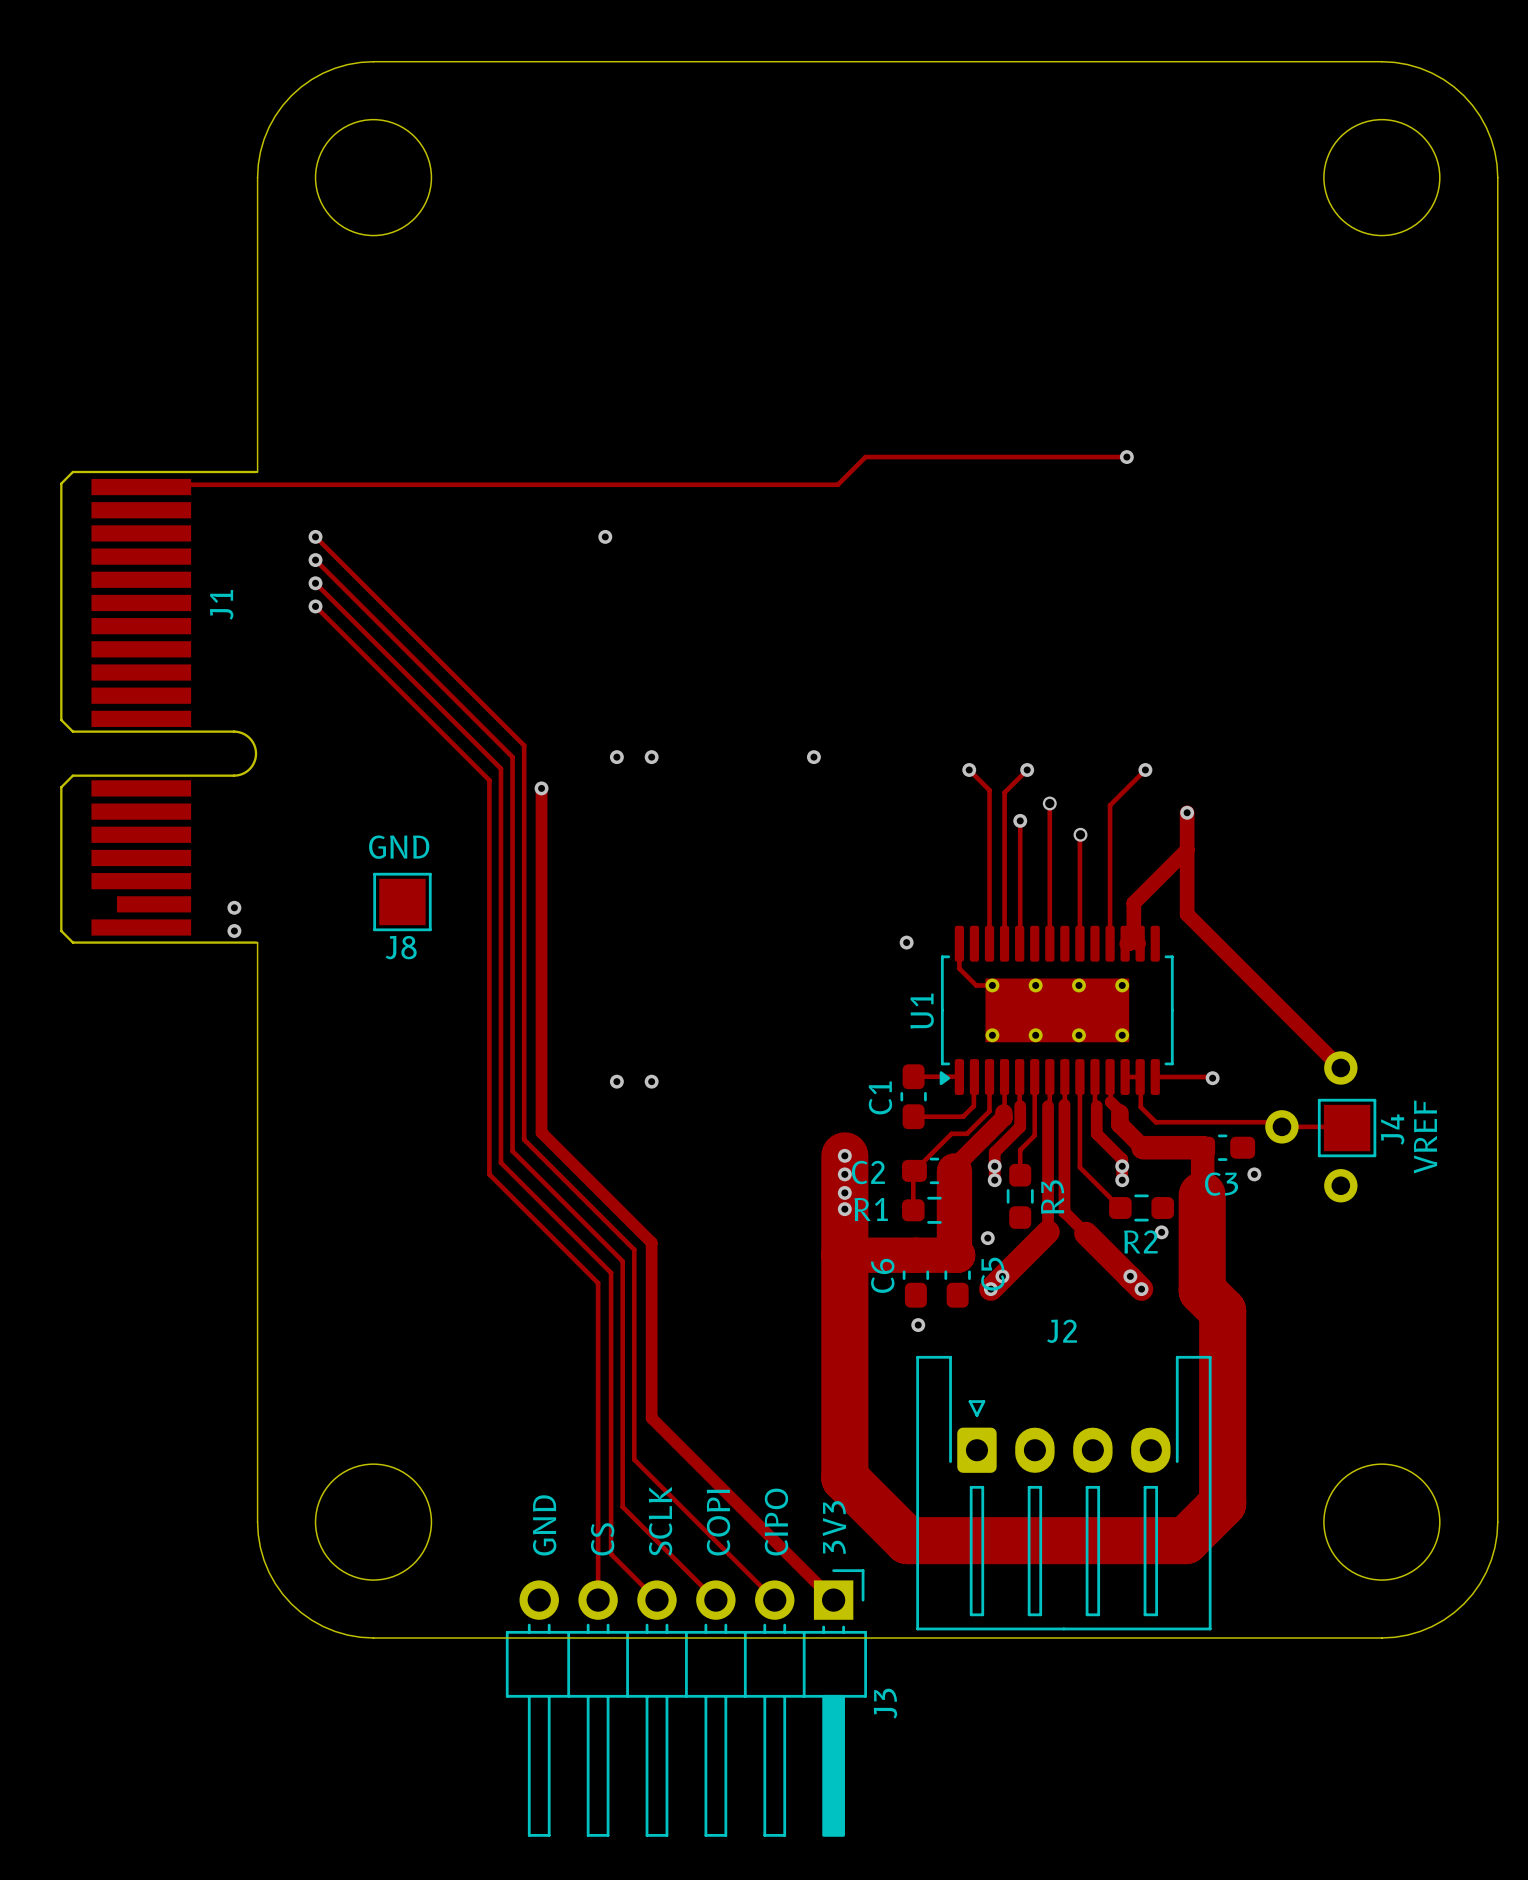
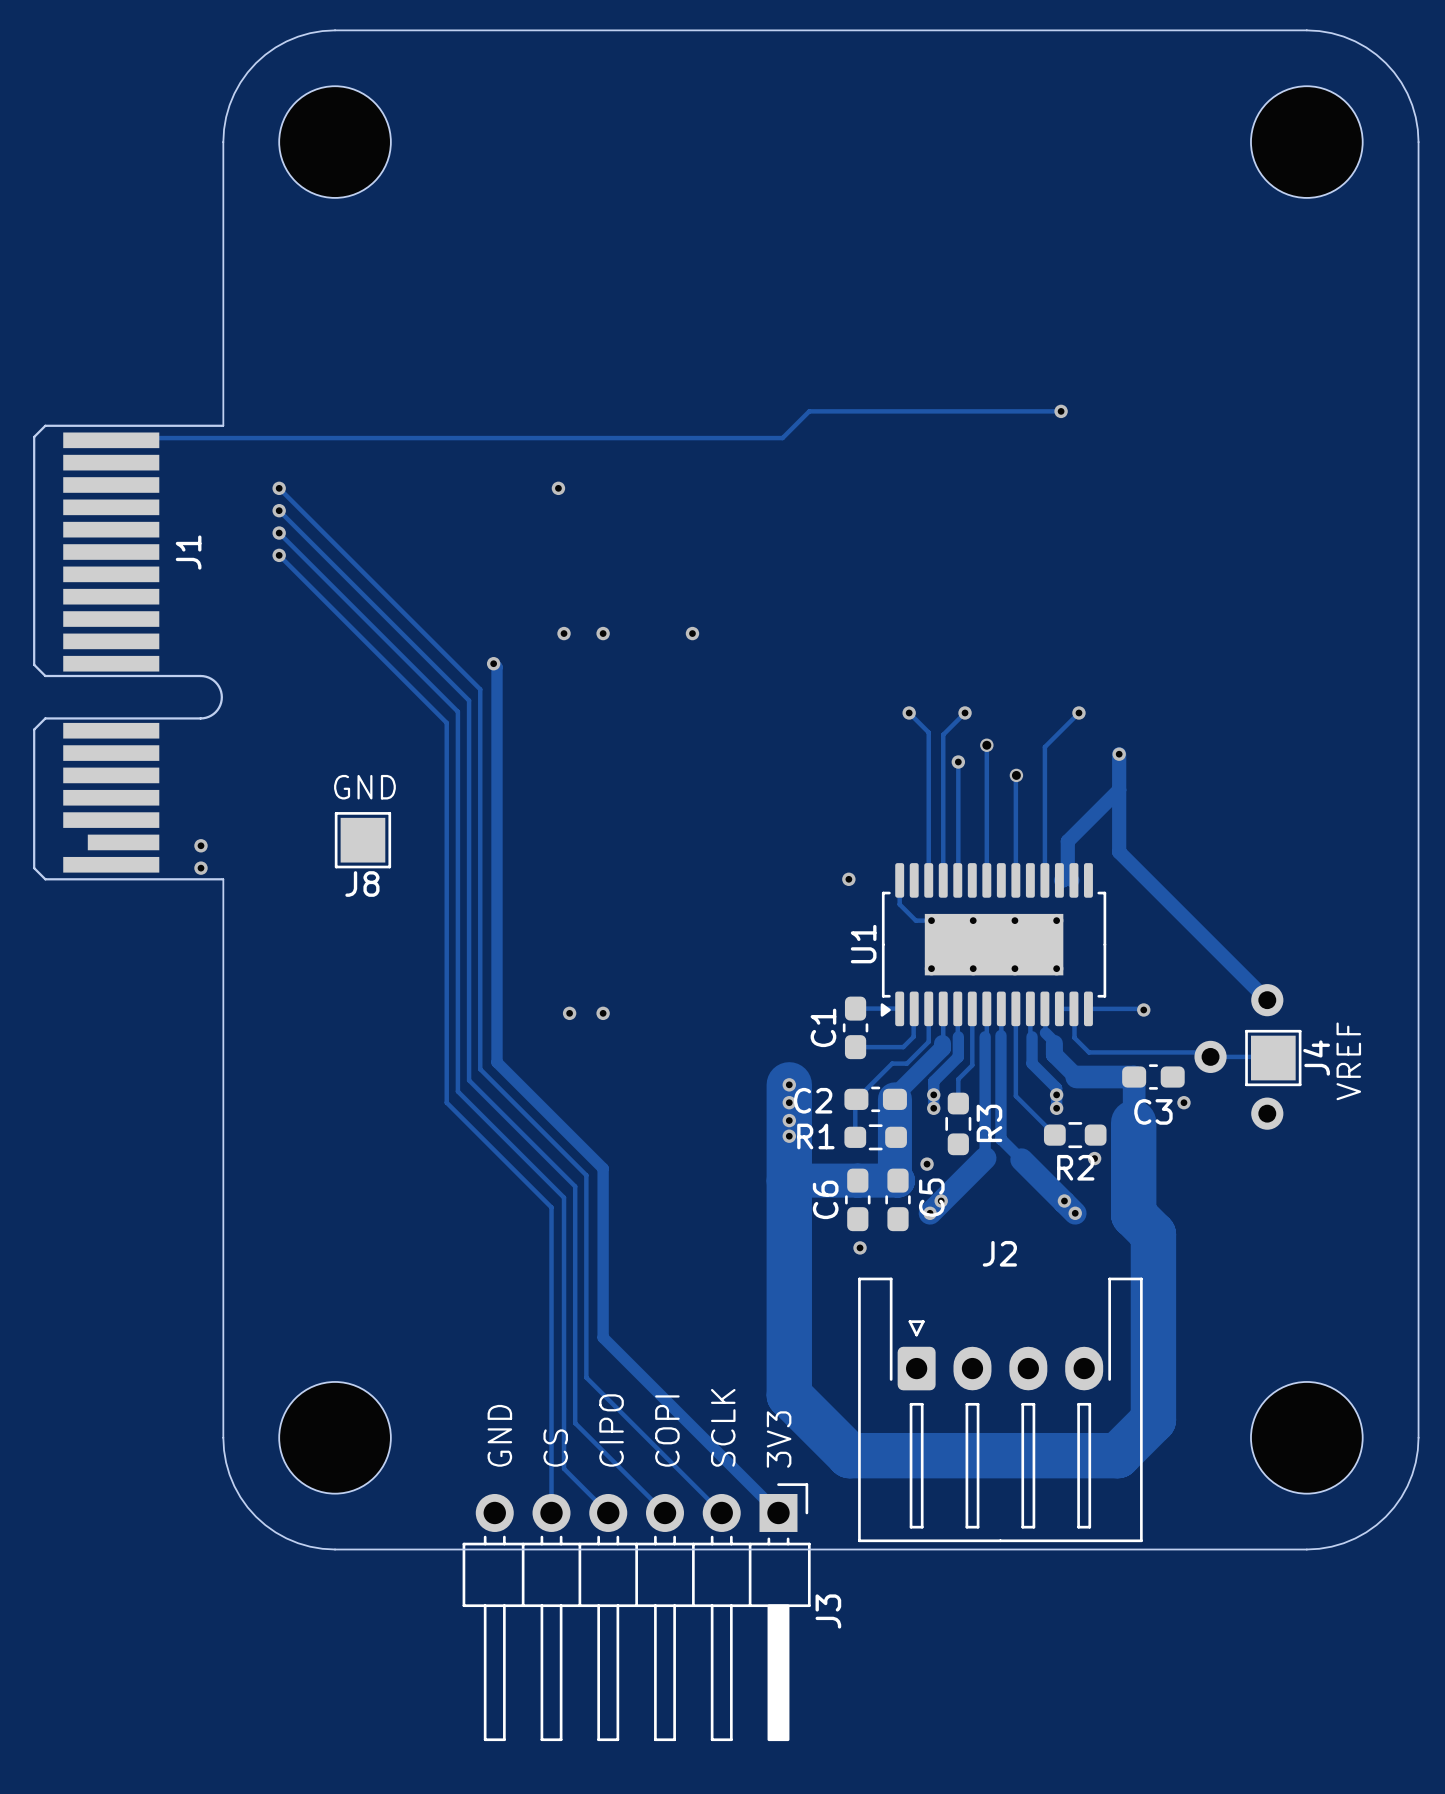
via: none -> (564, 633)
via: none -> (603, 633)
via: none -> (692, 633)
track: none -> (493, 663) (497, 667) (497, 730)
via: none -> (493, 663)
via: (616, 757) -> none
via: (651, 757) -> none
via: (813, 757) -> none
via: (541, 788) -> none
text: SCLK (660, 1521) -> CIPO (611, 1430)
text: CIPO (776, 1522) -> SCLK (723, 1427)

